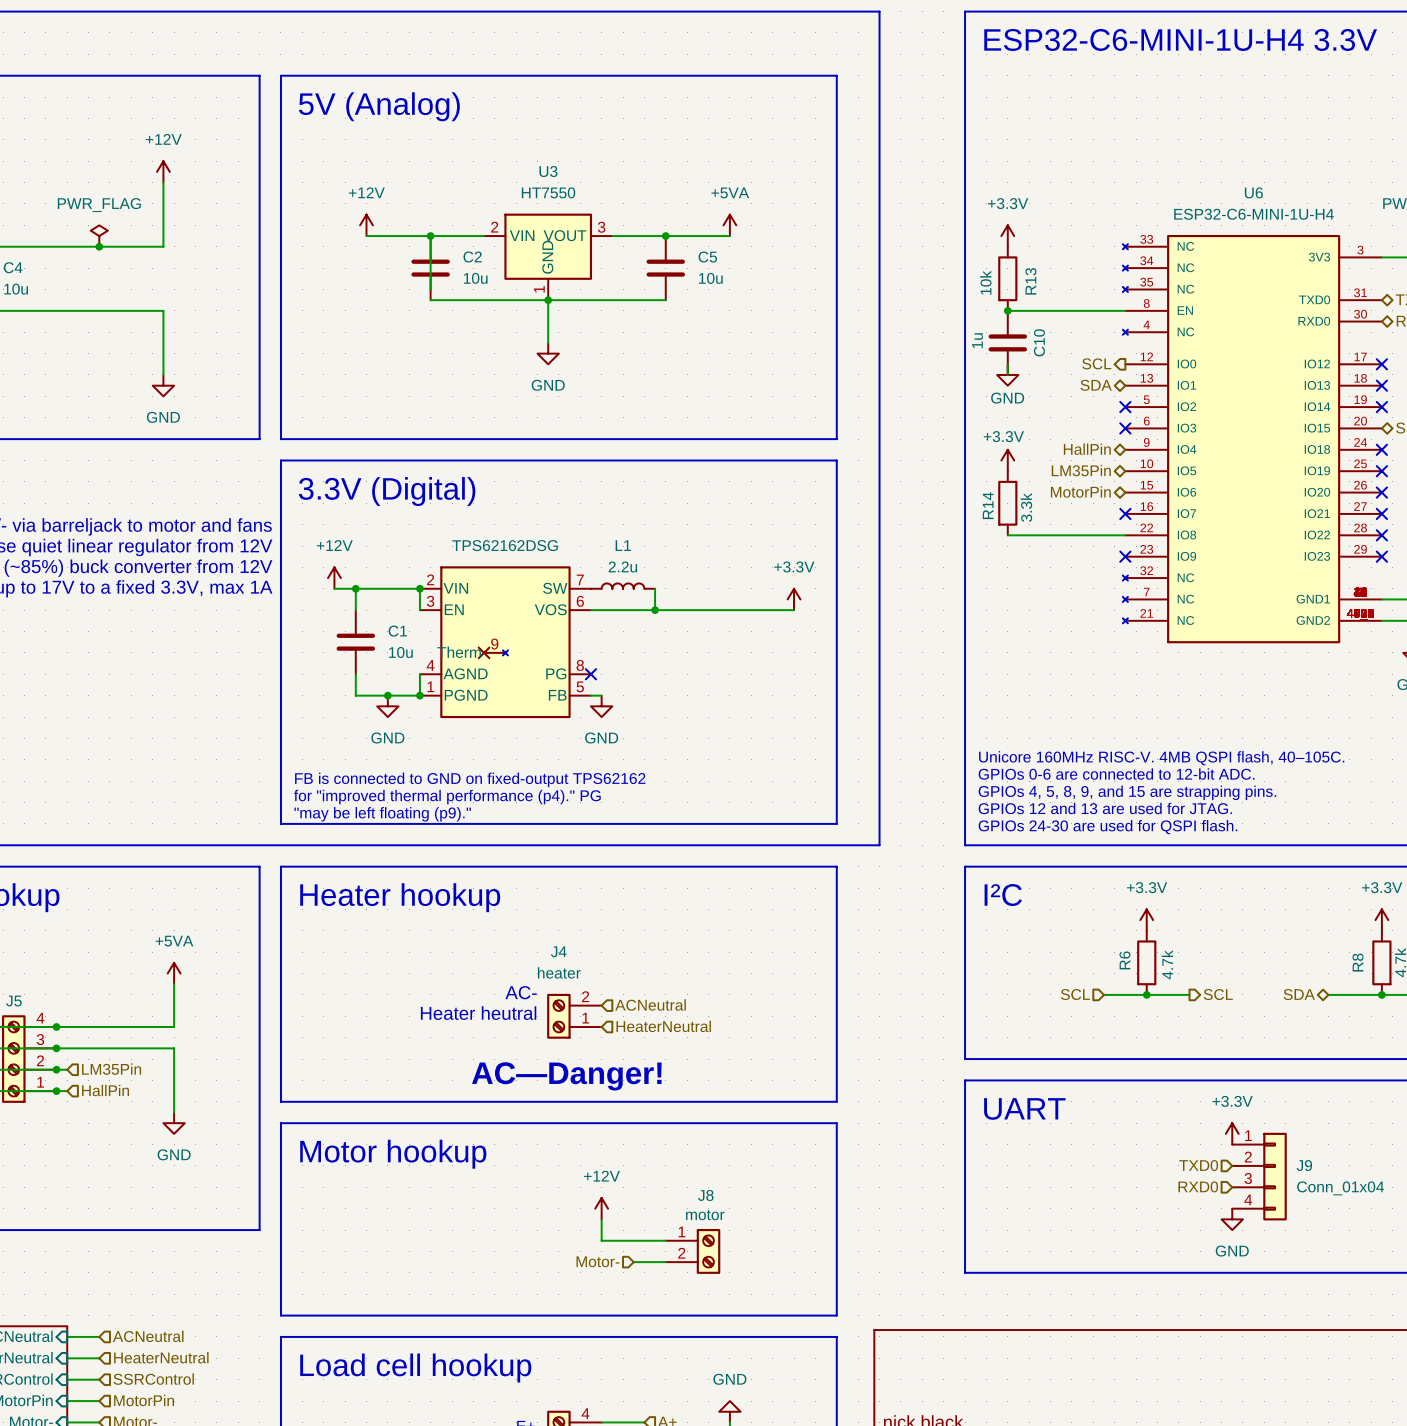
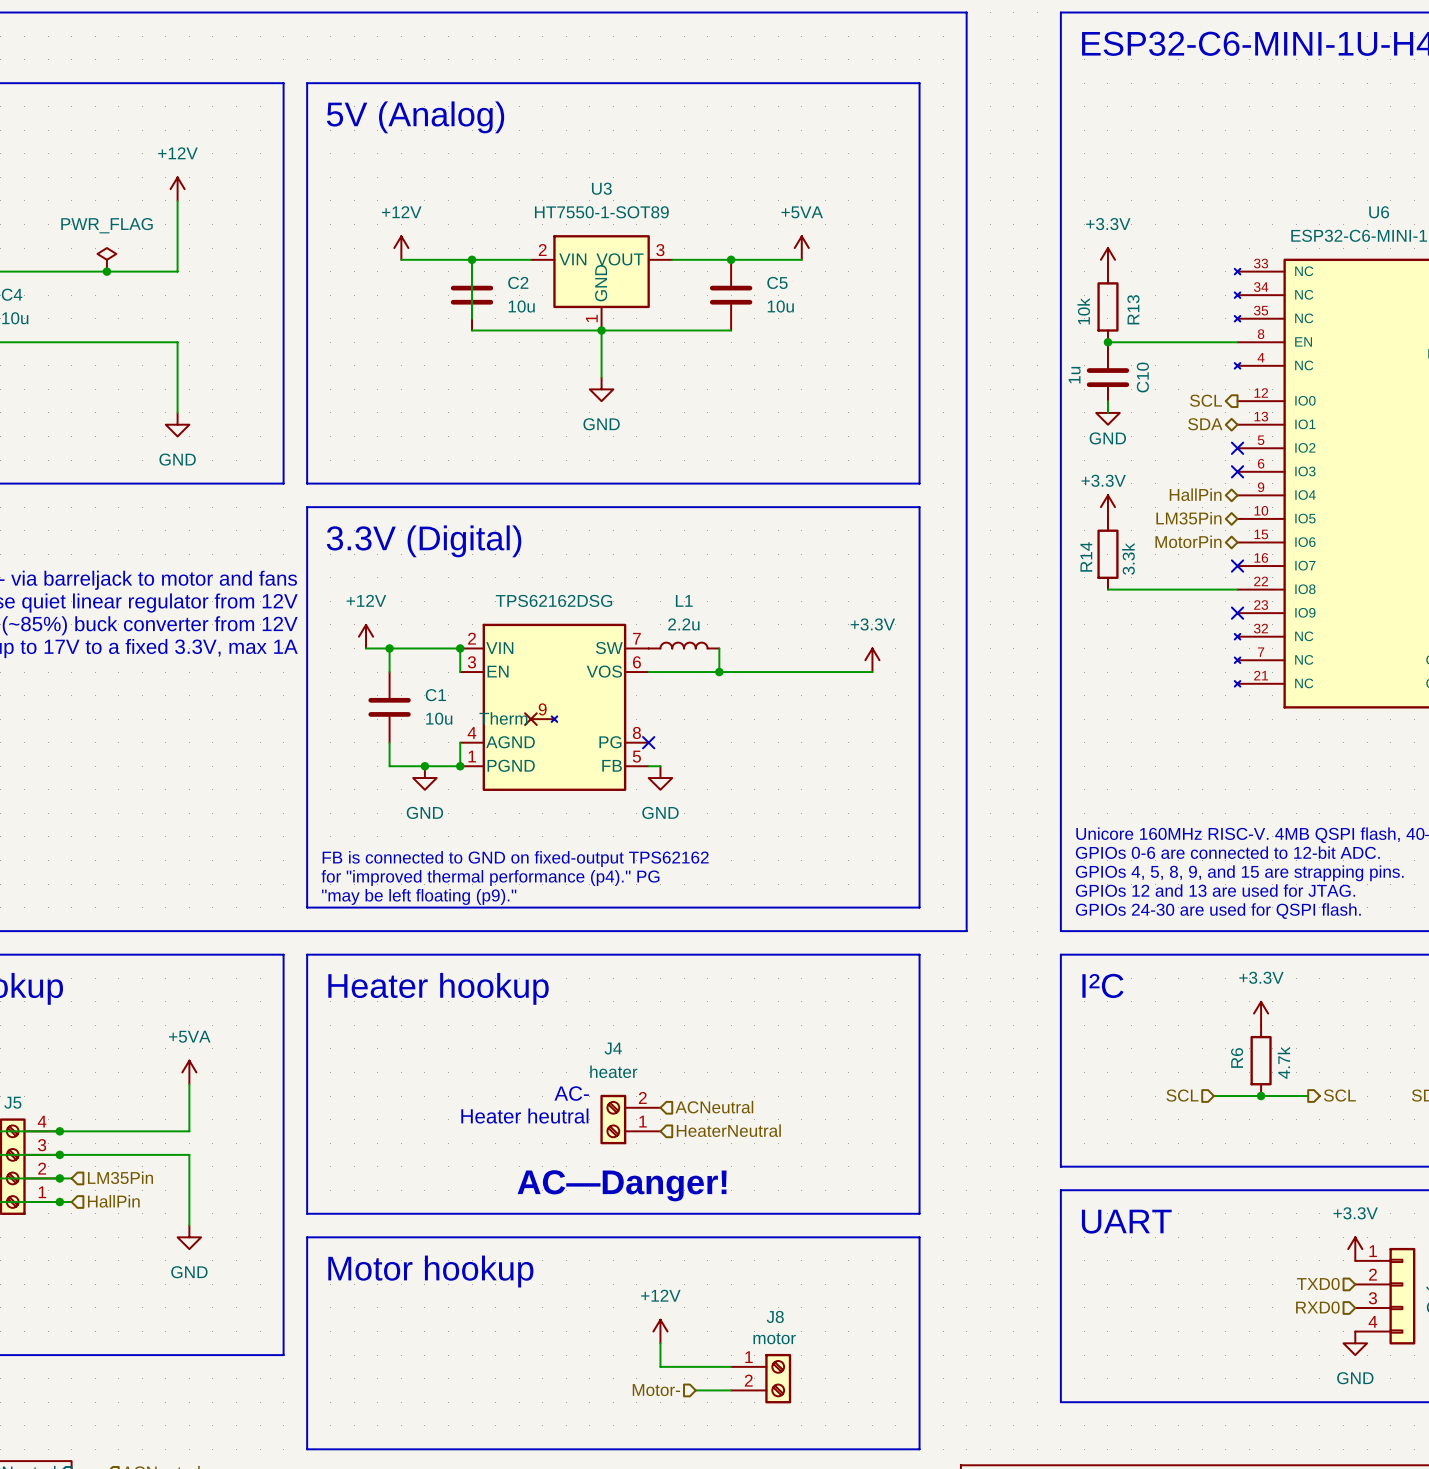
U3 value: HT7550 (548, 192) -> HT7550-1-SOT89 (601, 212)

